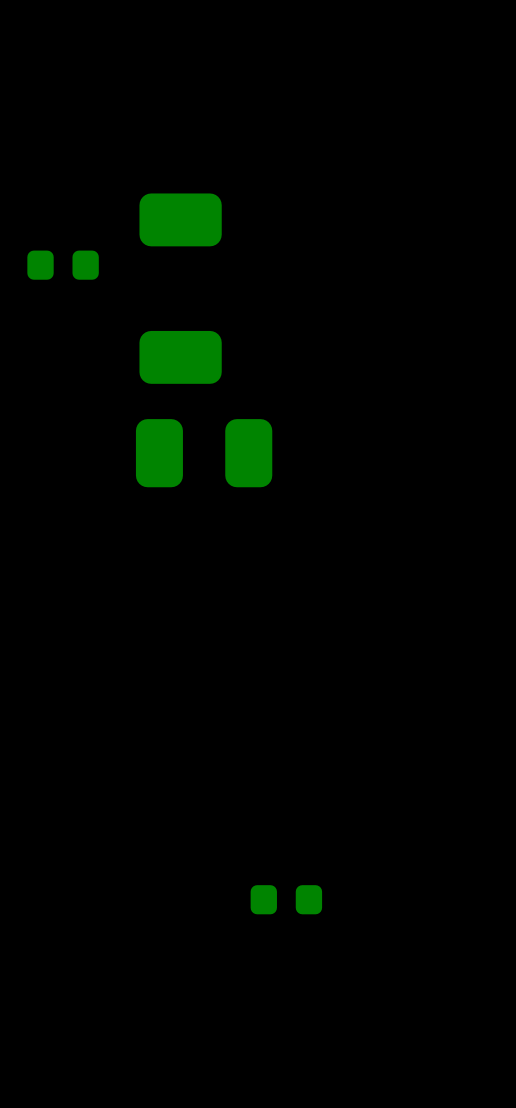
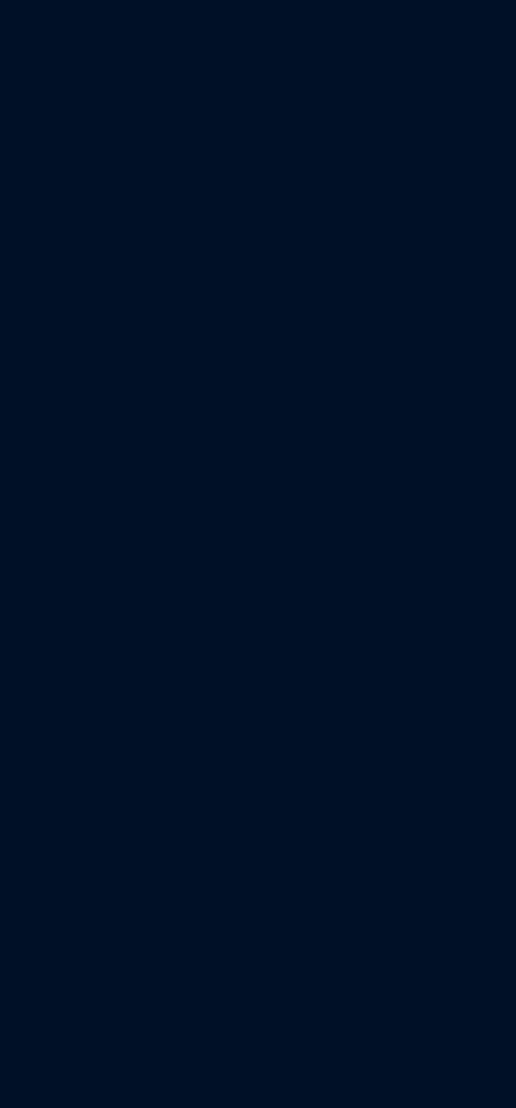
part: (63, 265) -> none
part: (180, 288) -> none
part: (204, 453) -> none
part: (286, 899) -> none

